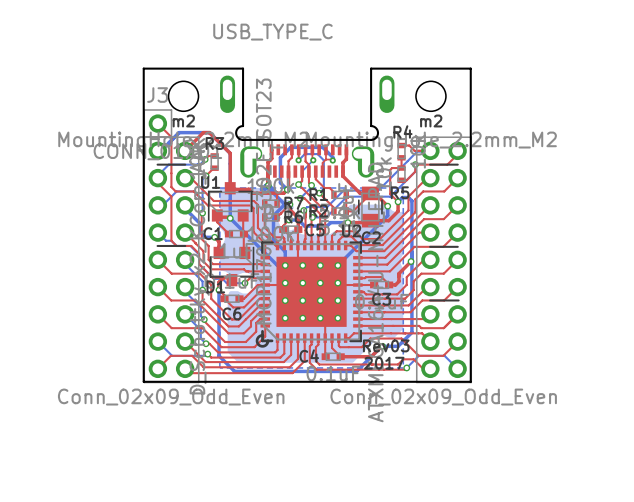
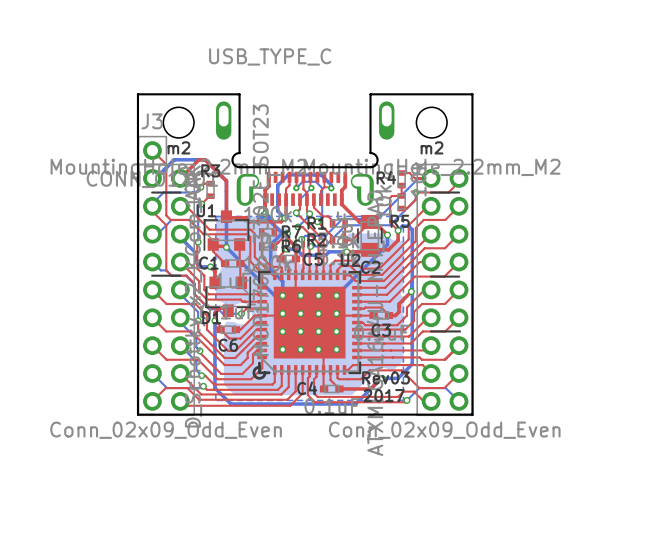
R4 name position: R4 (402, 131) -> R4 (386, 177)

